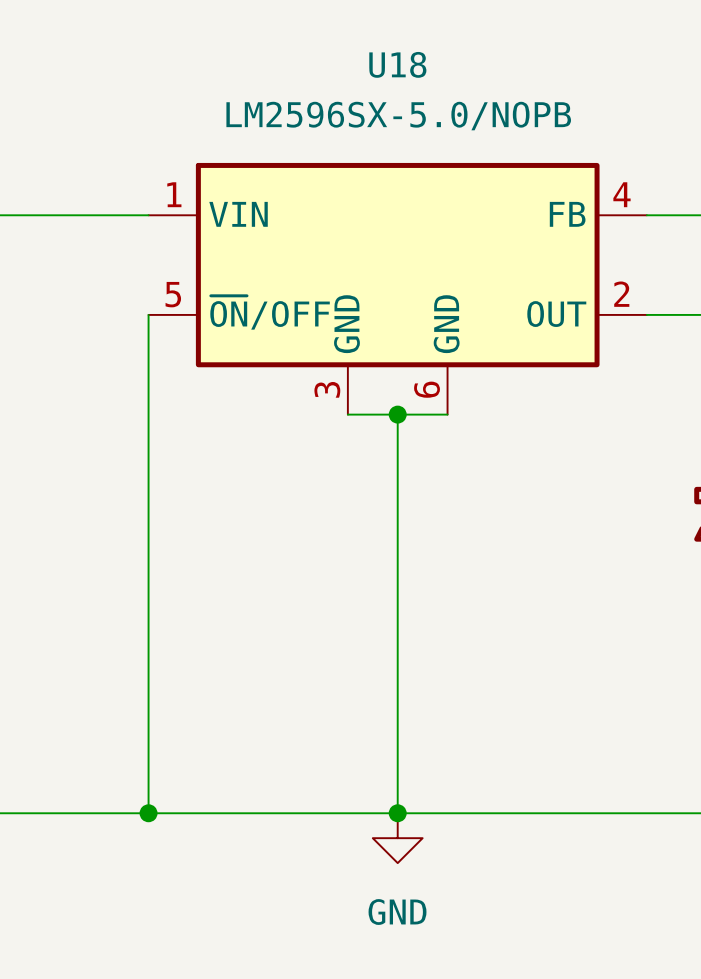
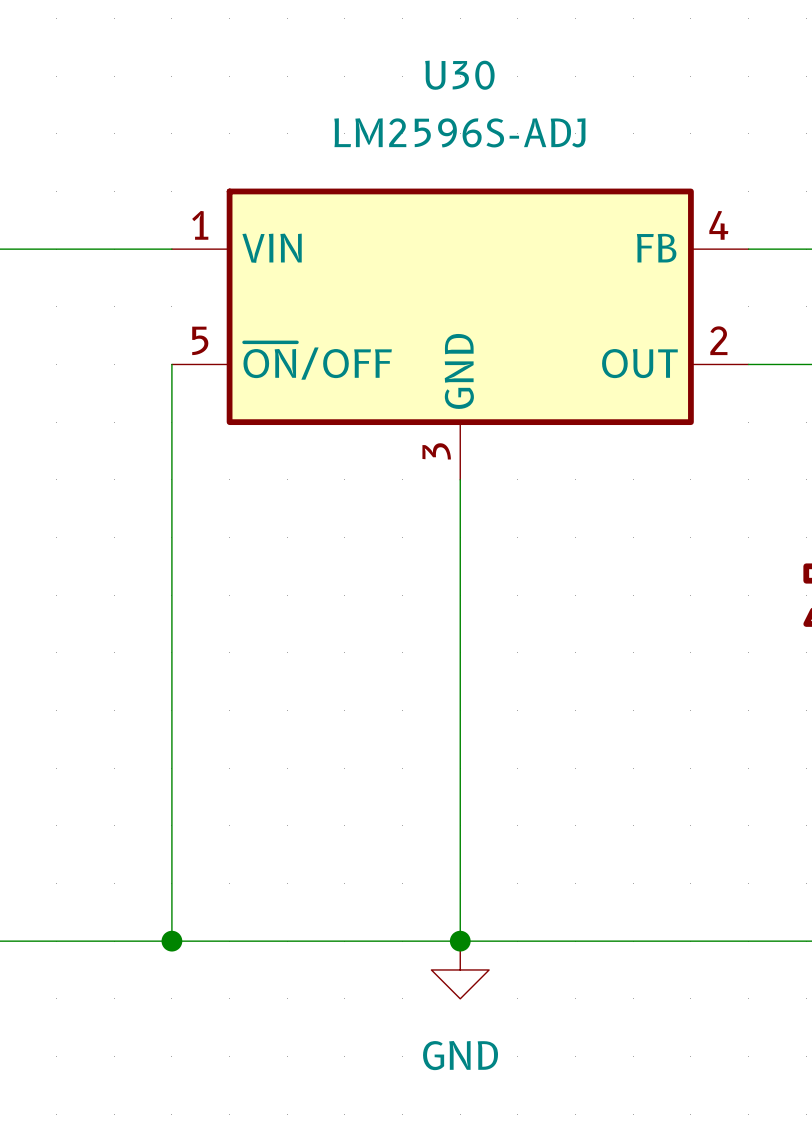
U18: LM2596SX-5.0/NOPB (397, 288) -> none
U30: none -> LM2596S-ADJ (460, 334)
wire: (347, 414) (447, 414) -> none
junction: (397, 414) -> none

